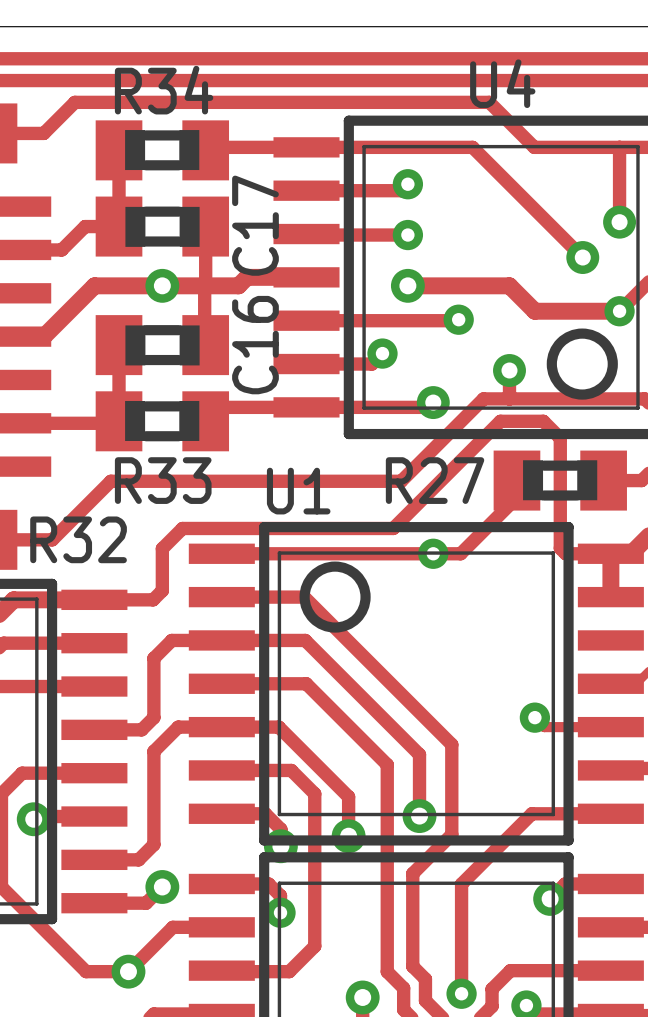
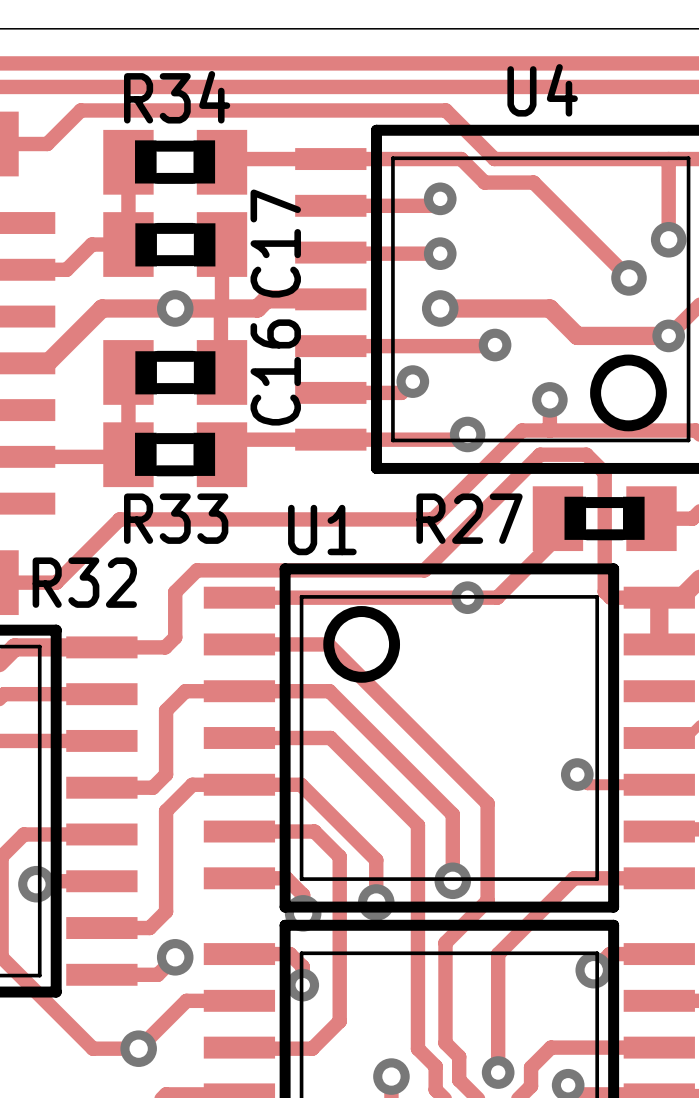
track: (413, 102) (489, 102) (534, 147) -> (445, 110) (494, 159)
track: (427, 147) (458, 147) -> (461, 159) (484, 182) (533, 182)
track: (472, 147) (494, 169) -> (510, 159) (576, 159)

